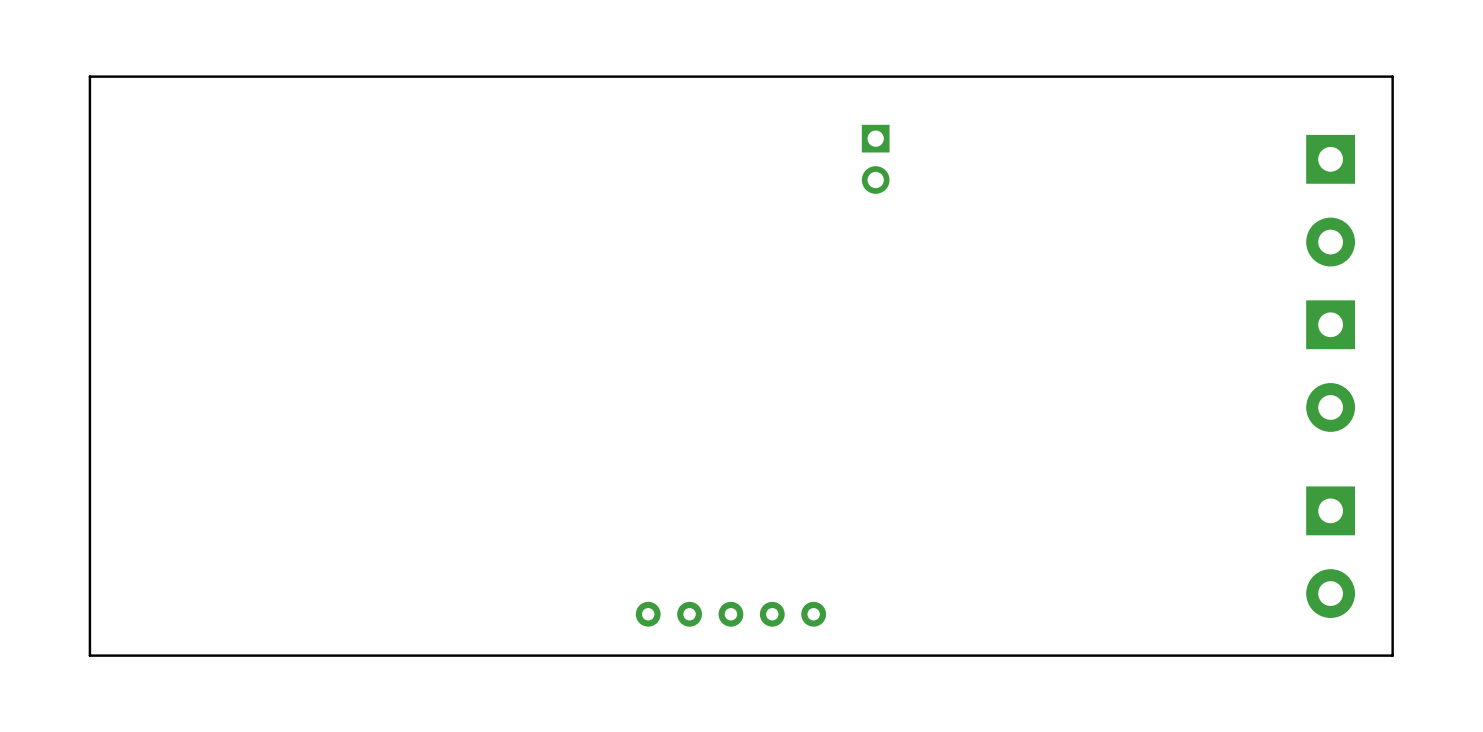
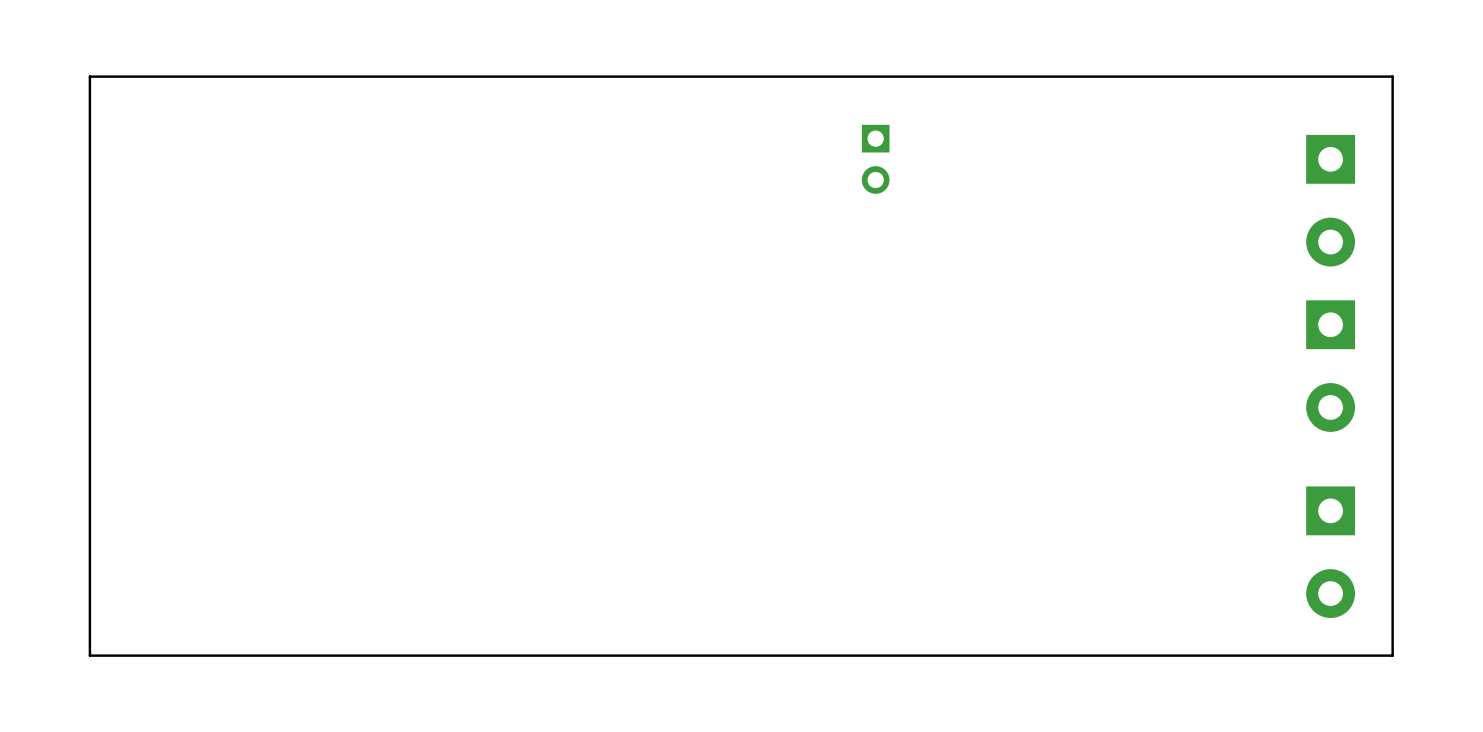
part: (730, 614) -> none

